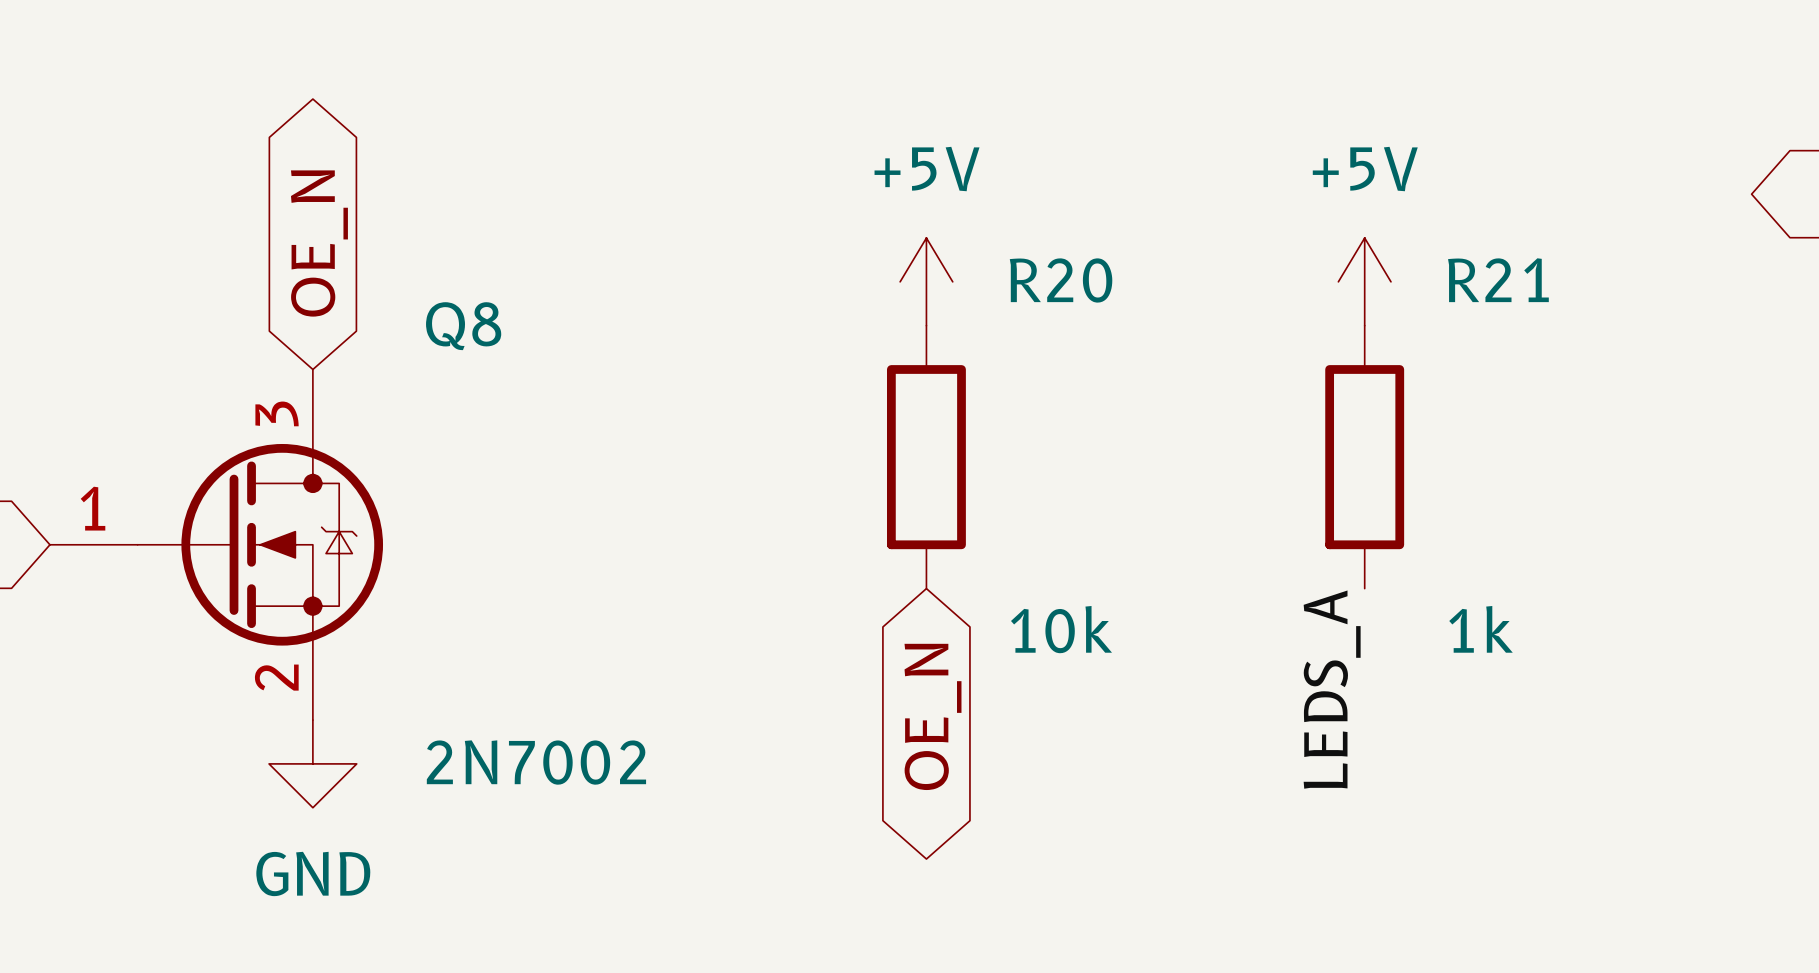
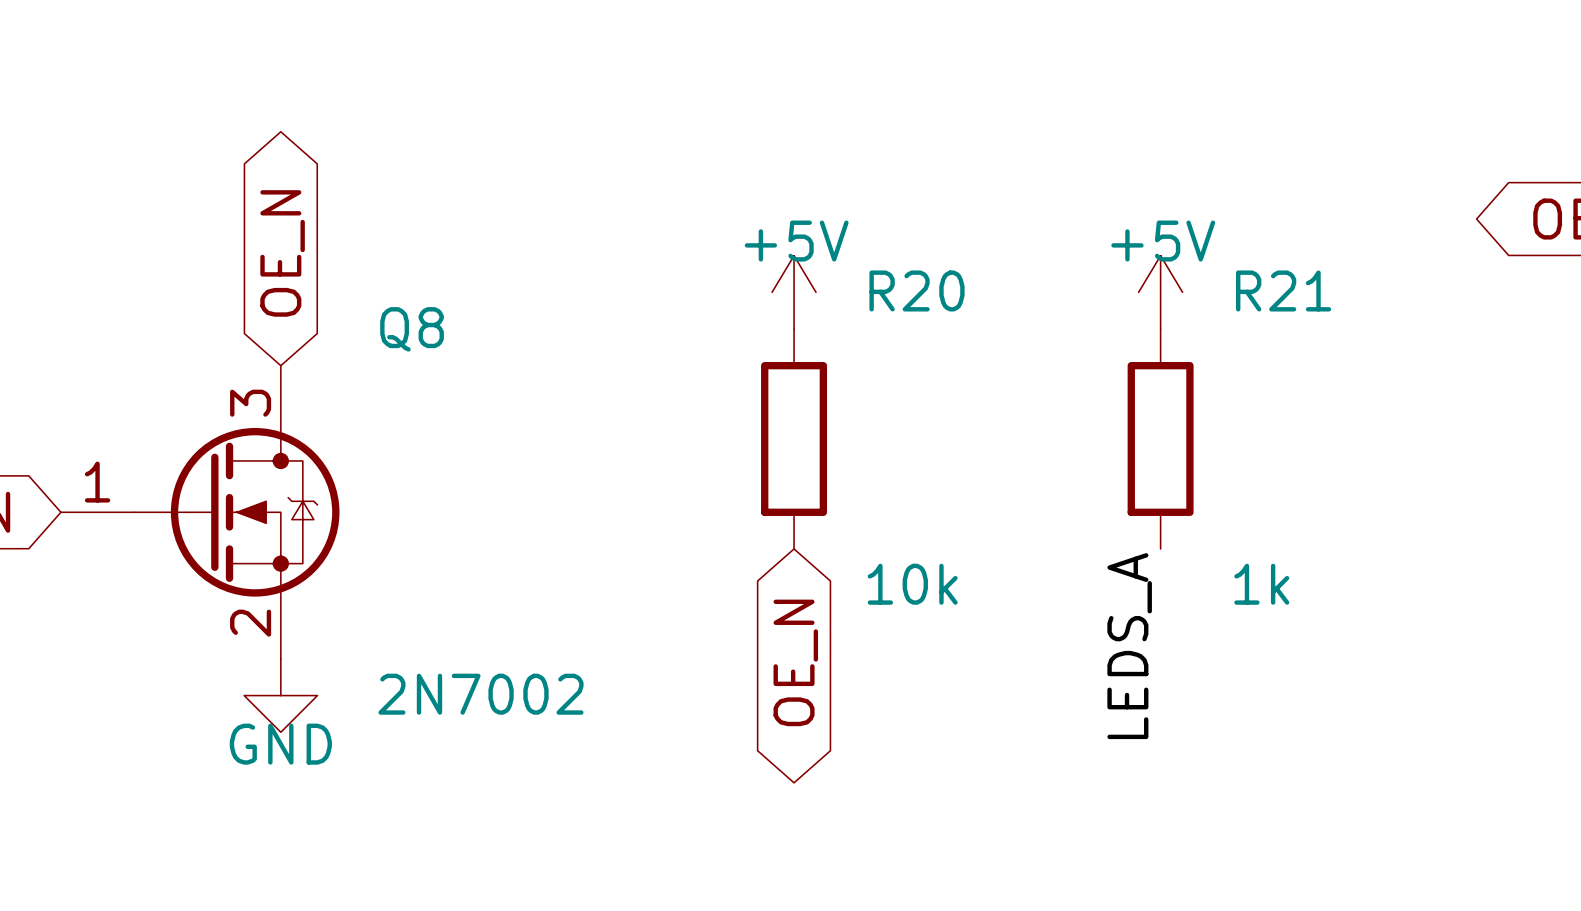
power symbol text position: +5V (927, 169) -> +5V (796, 241)
power symbol text position: +5V (1365, 169) -> +5V (1163, 241)
power symbol text position: GND (313, 873) -> GND (280, 744)

